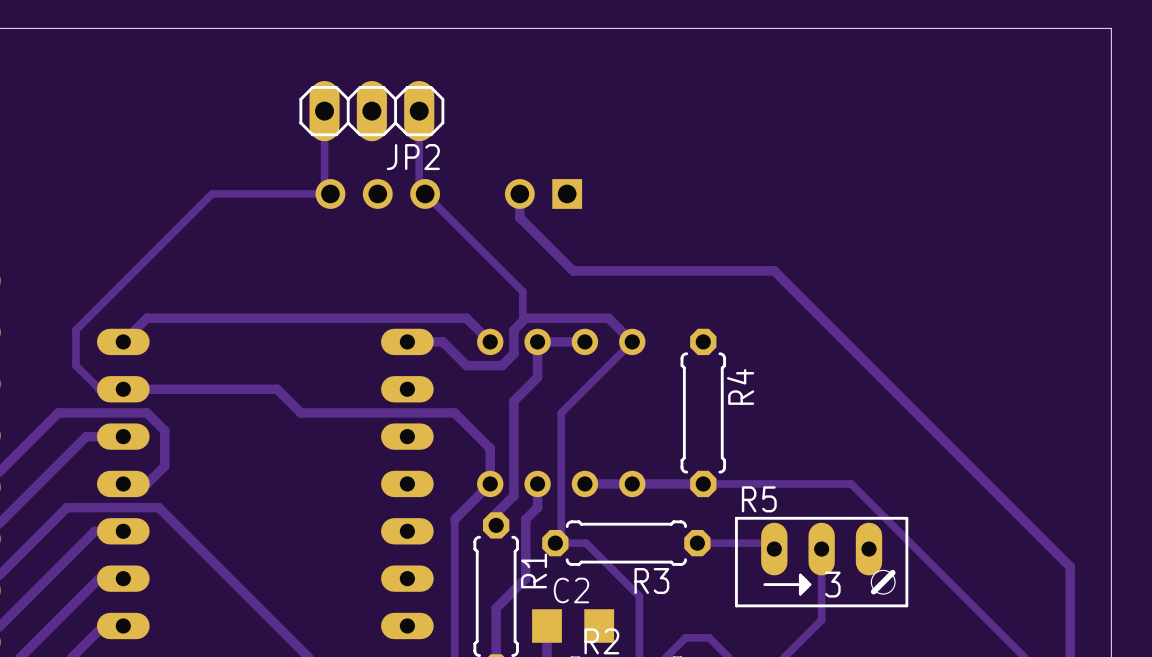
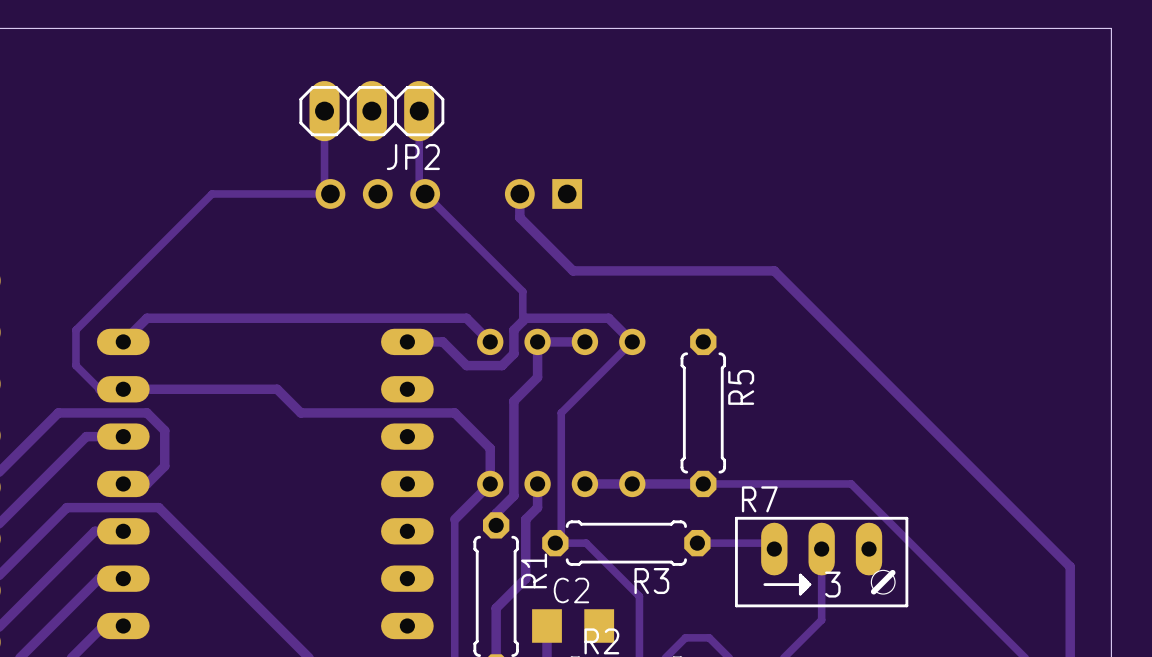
R4 name: R4 (740, 386) -> R5 (741, 387)
R5 name: R5 (759, 499) -> R7 (759, 499)

